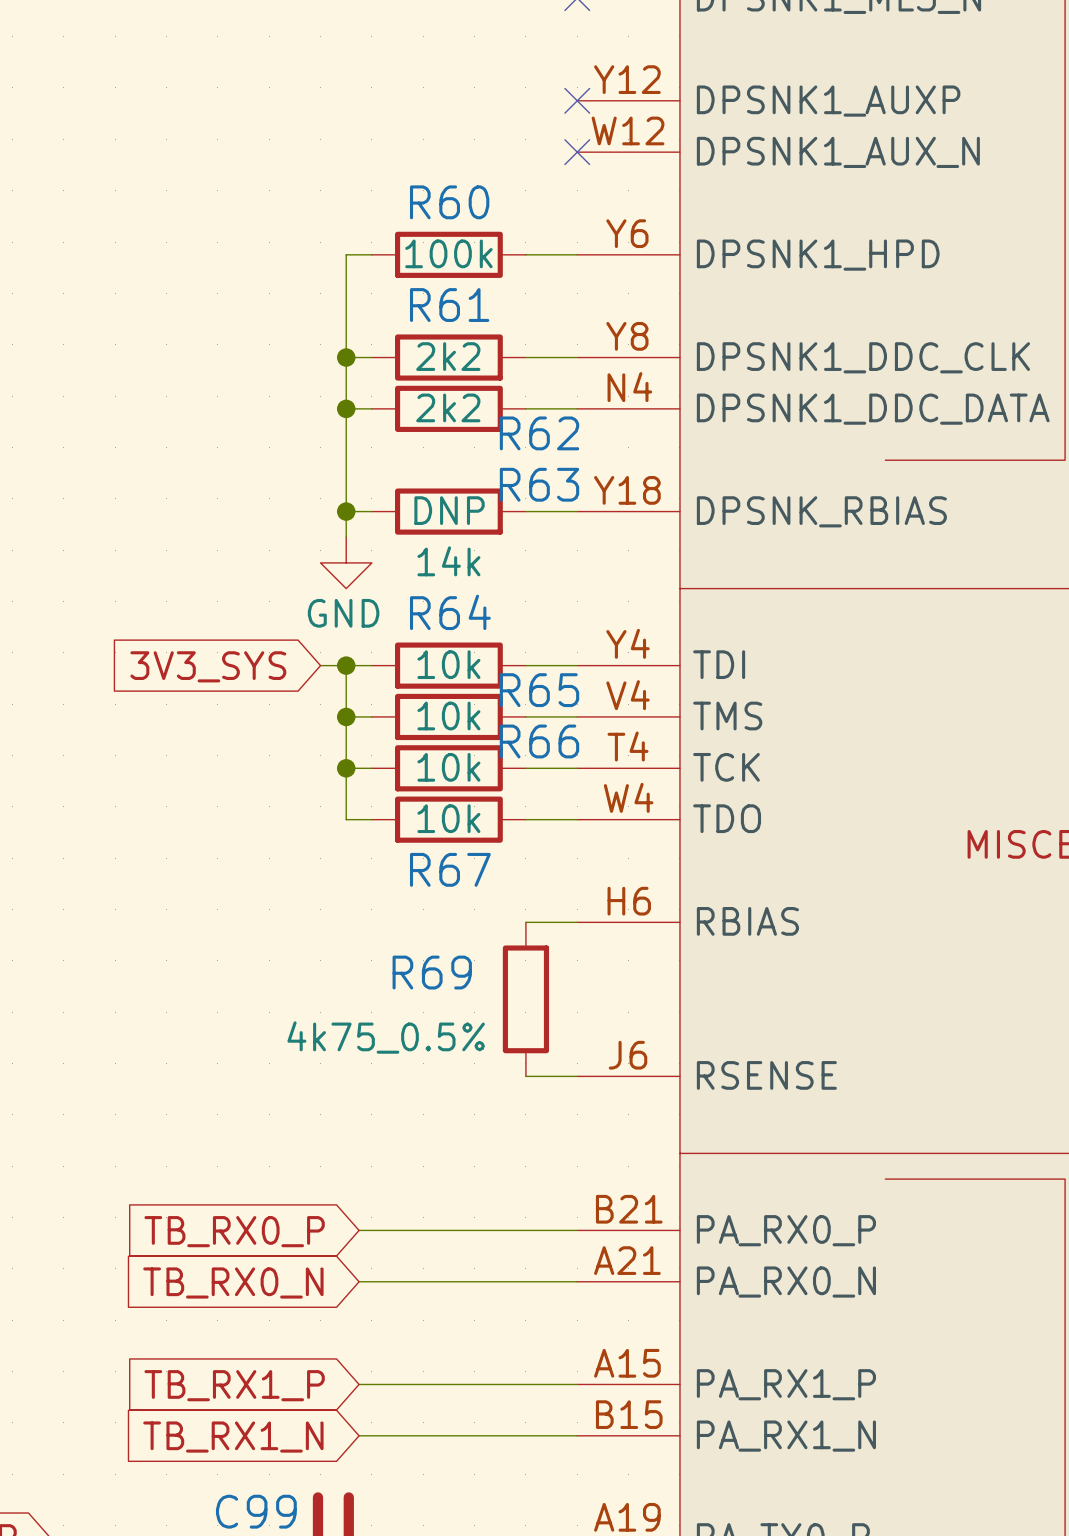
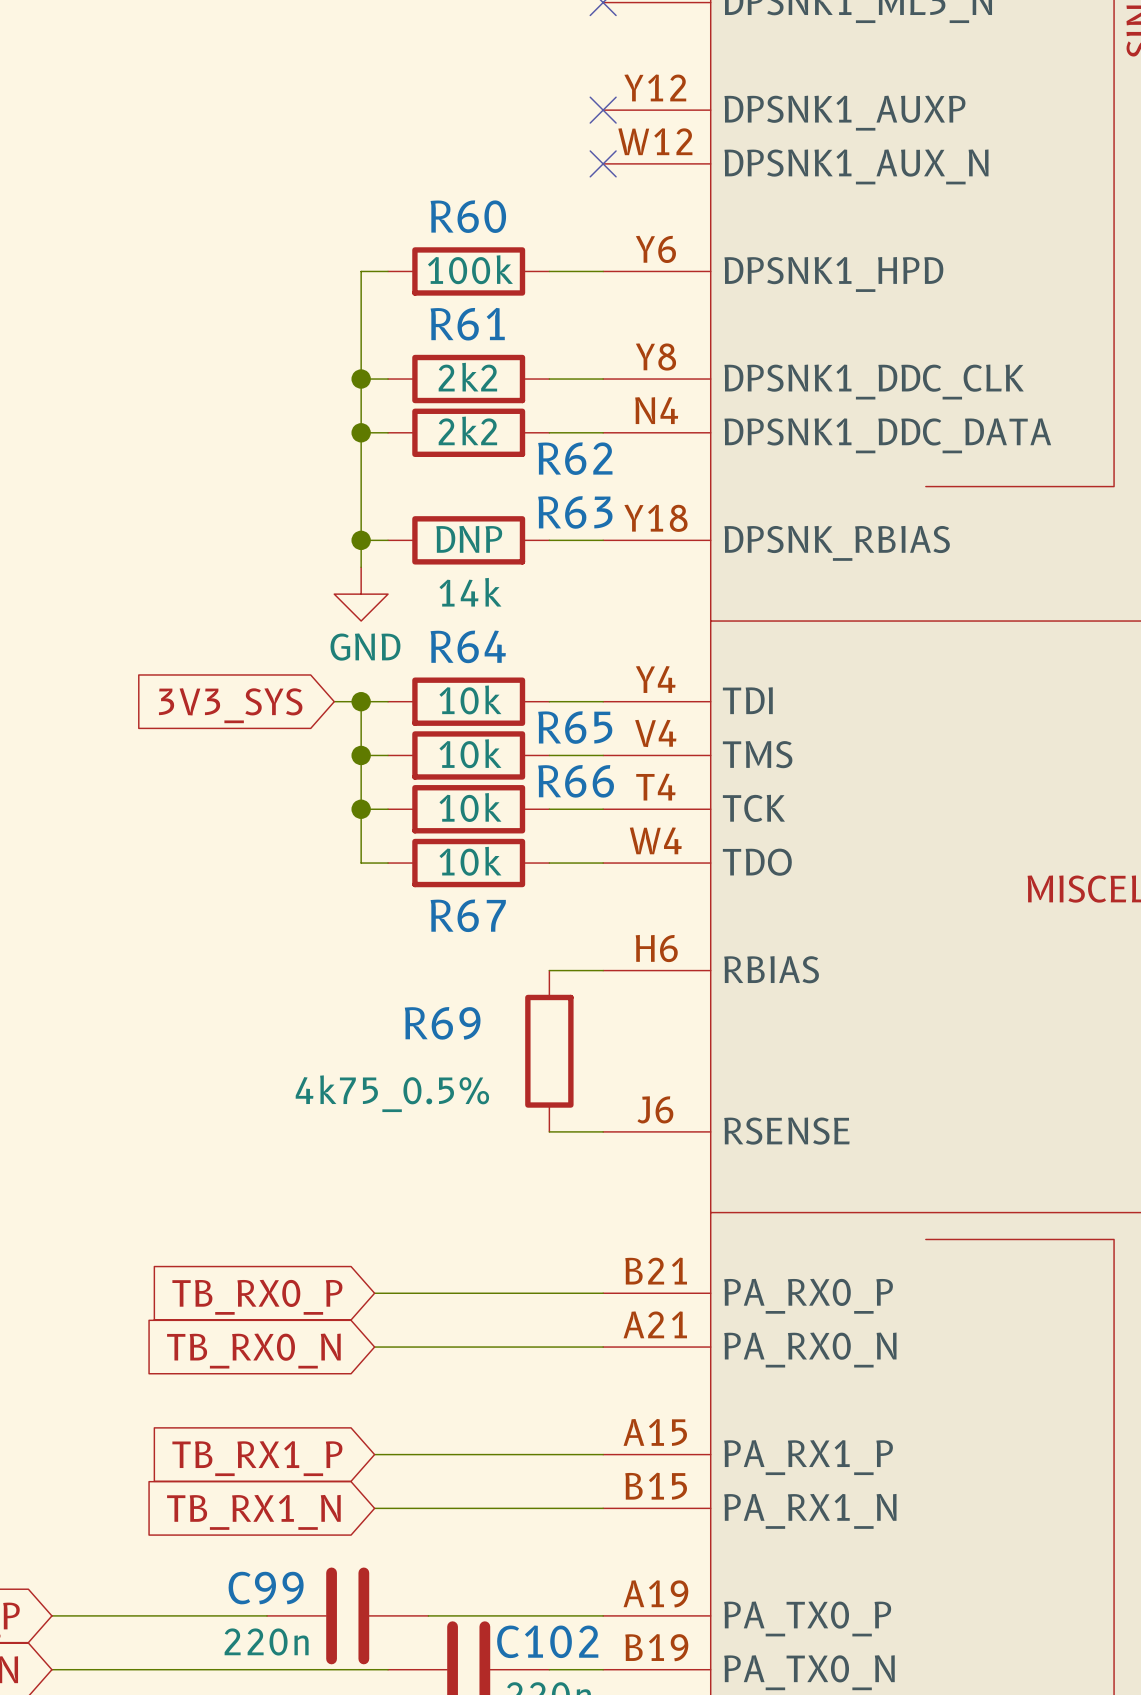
R62 name position: R62 (539, 433) -> R62 (575, 458)
R63 name position: R63 (539, 484) -> R63 (575, 512)
R65 name position: R65 (539, 690) -> R65 (575, 727)
R66 name position: R66 (539, 741) -> R66 (576, 781)

